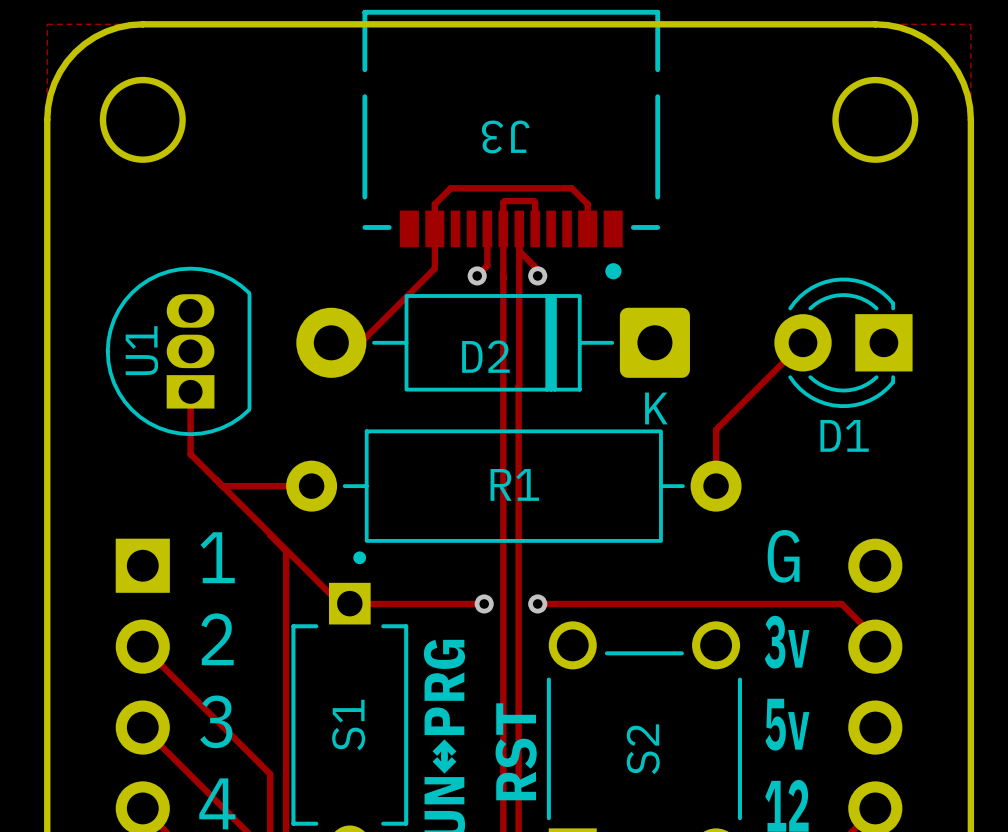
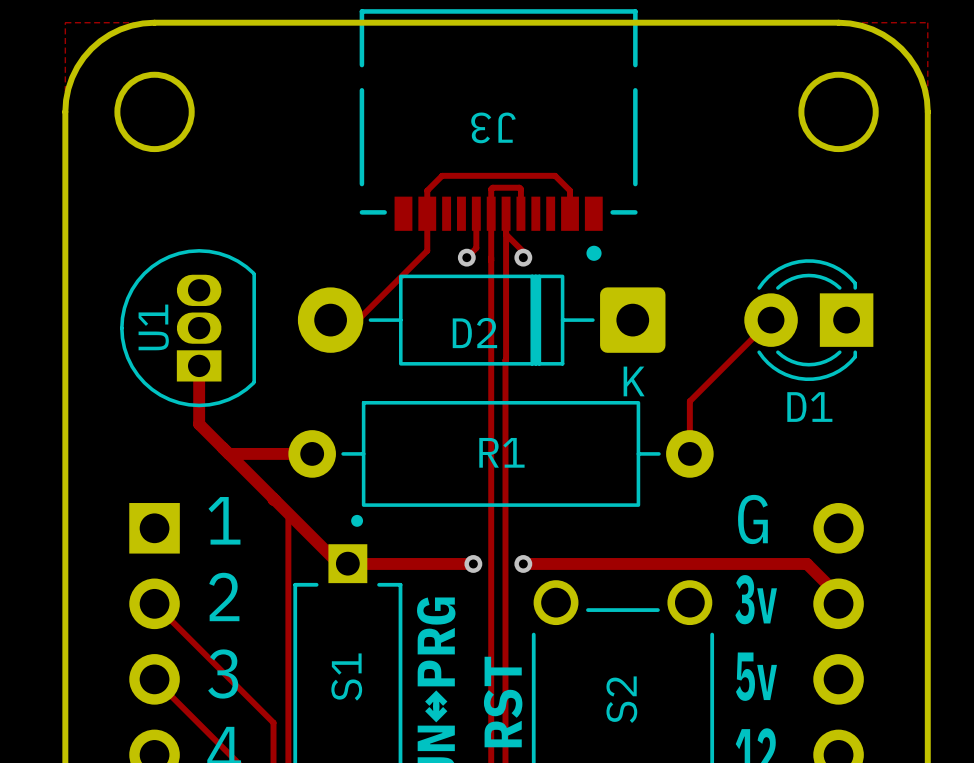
track width: thin (190, 391) (190, 454) (339, 603) (349, 603) -> thick (199, 365) (199, 424) (338, 563) (347, 563)
track width: thin (222, 486) (311, 486) -> thick (228, 453) (312, 453)
track width: thin (350, 603) (484, 603) -> thick (348, 563) (473, 563)
track width: thin (537, 603) (841, 603) (875, 637) -> thick (523, 563) (807, 563) (838, 595)

